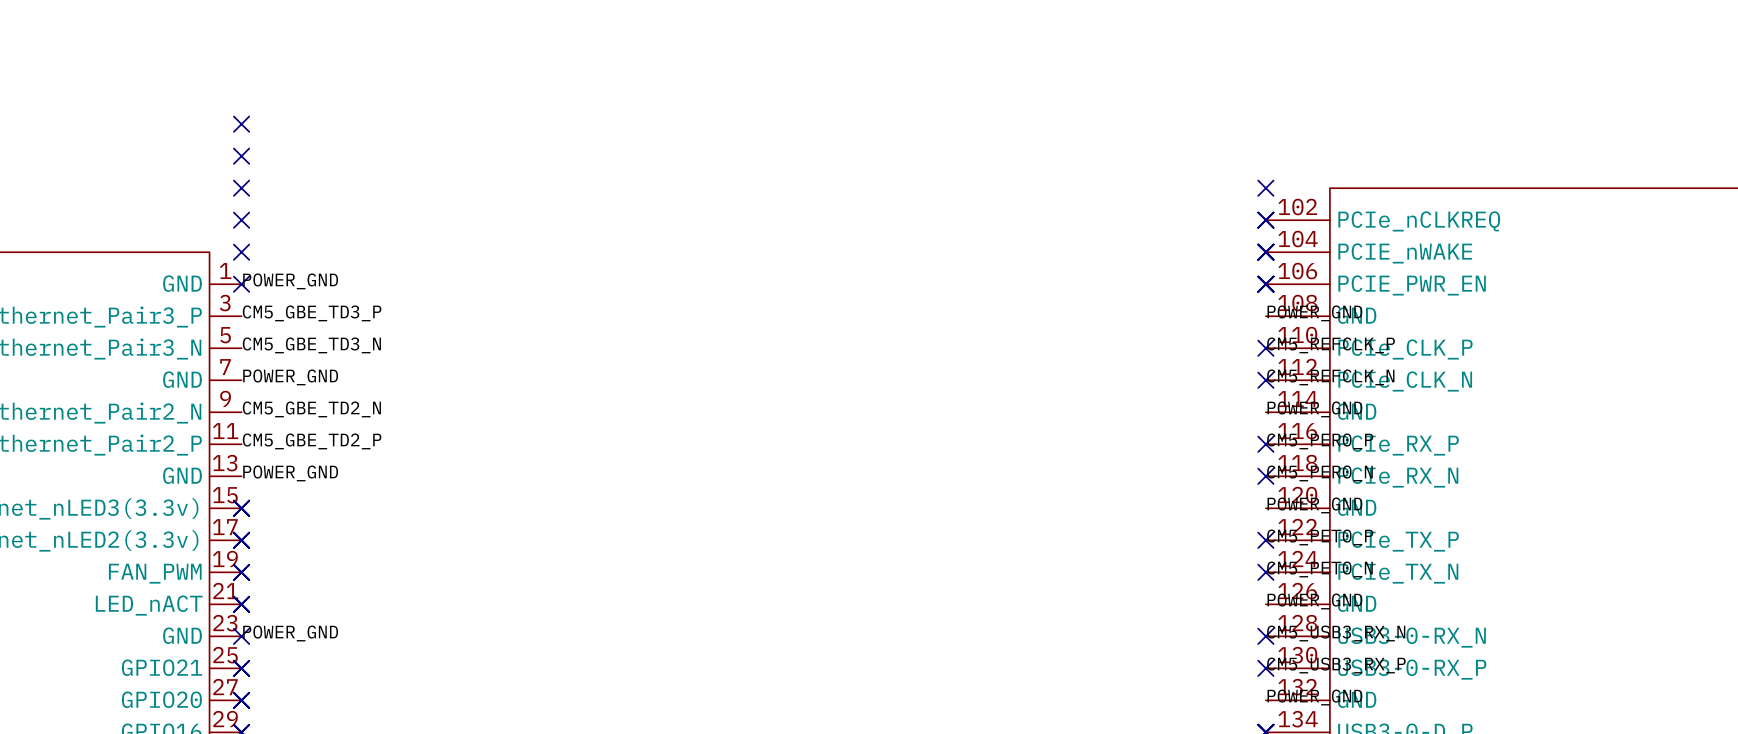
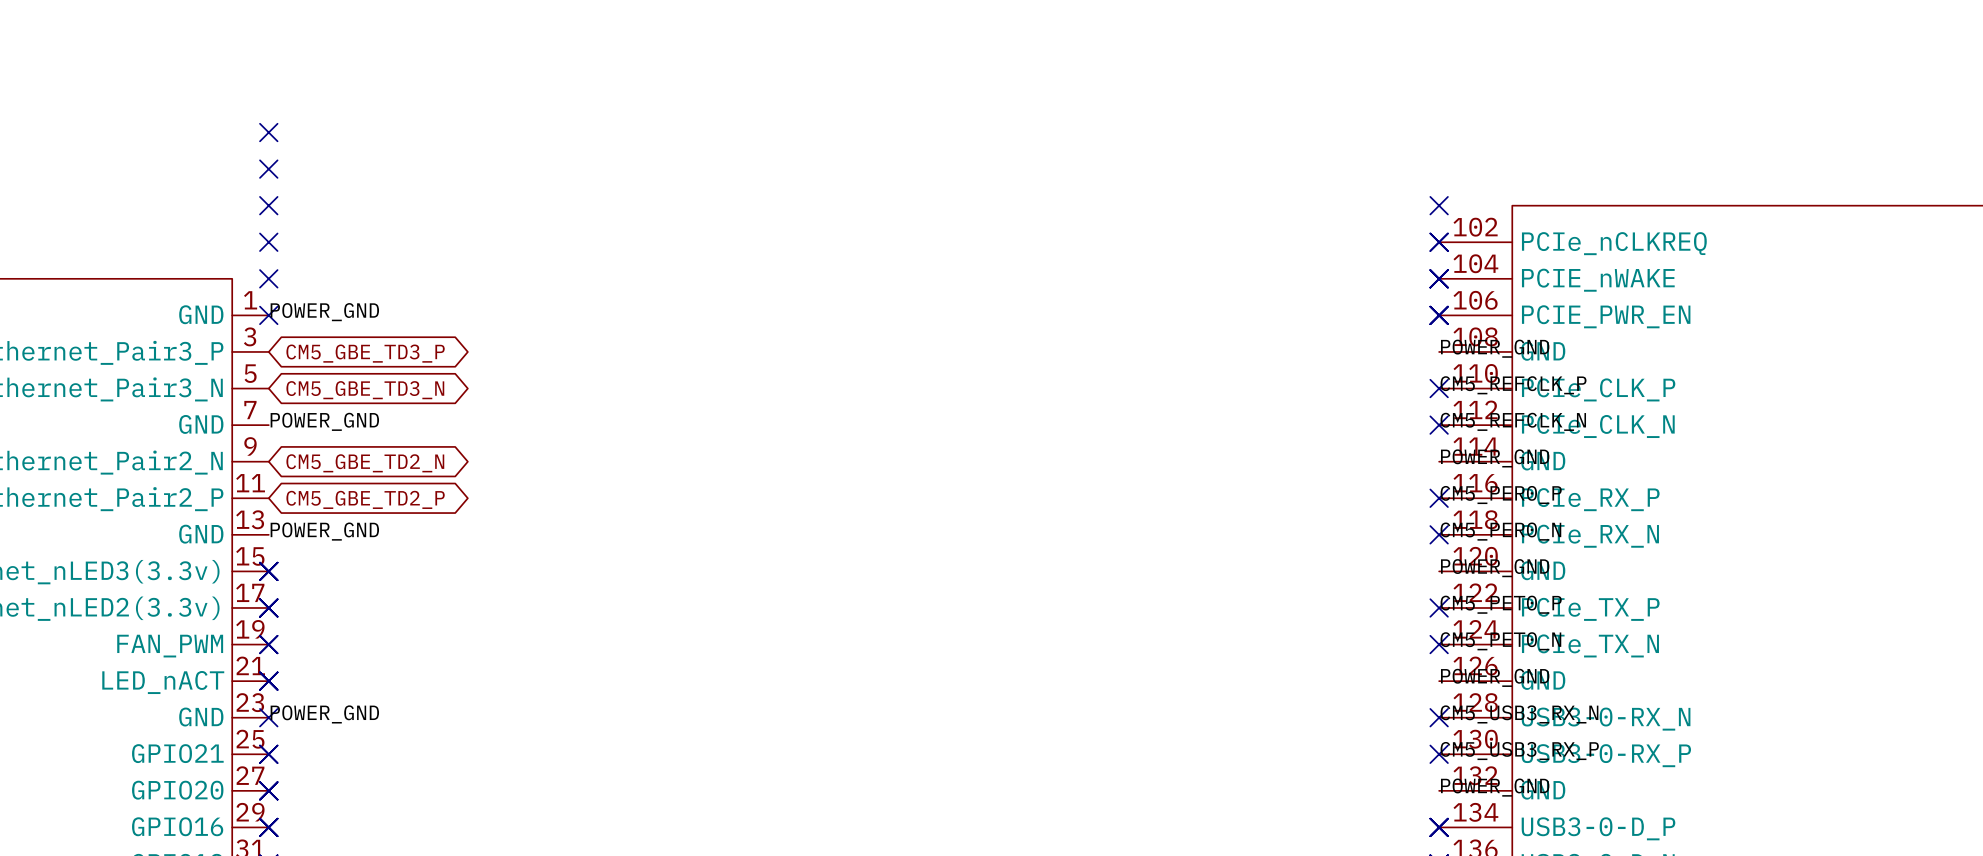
label: CM5_GBE_TD3_P (312, 313) -> none
global label: none -> CM5_GBE_TD3_P (365, 353)
label: CM5_GBE_TD3_N (311, 345) -> none
global label: none -> CM5_GBE_TD3_N (365, 390)
label: CM5_GBE_TD2_N (311, 409) -> none
global label: none -> CM5_GBE_TD2_N (365, 463)
label: CM5_GBE_TD2_P (312, 441) -> none
global label: none -> CM5_GBE_TD2_P (365, 499)

